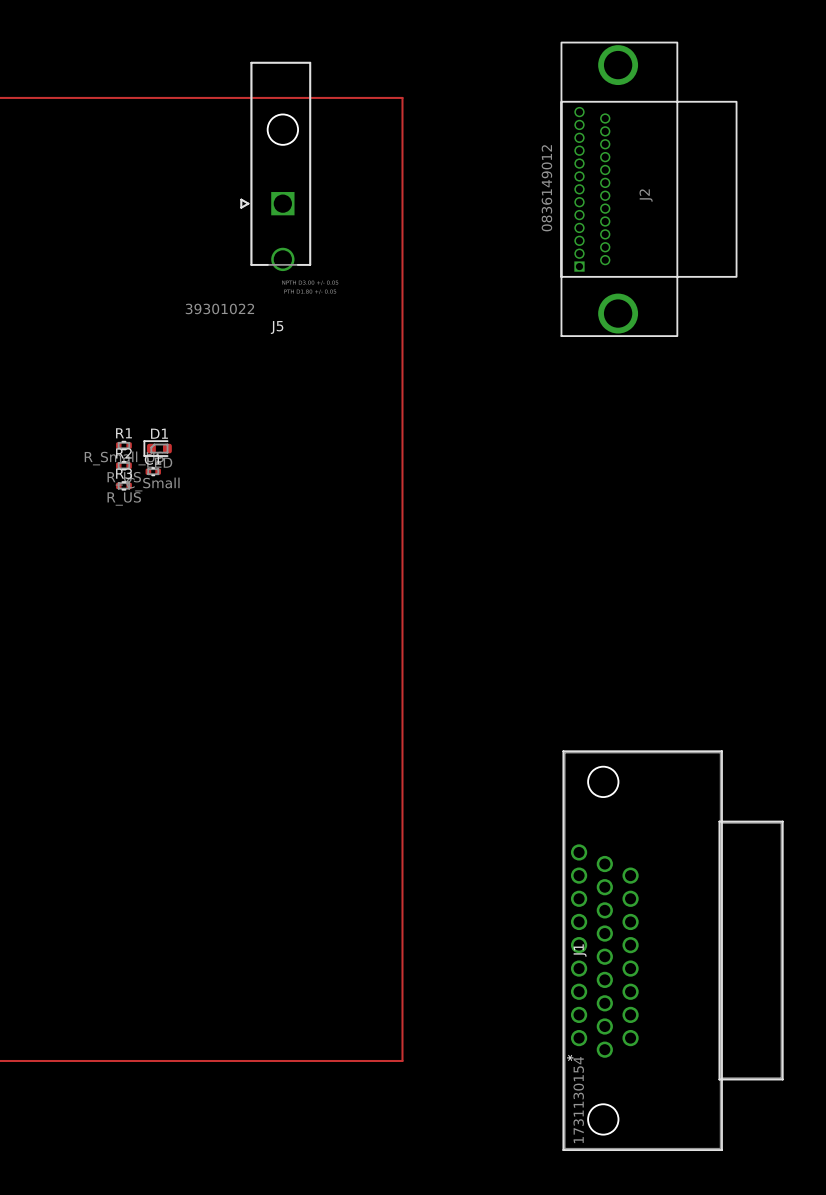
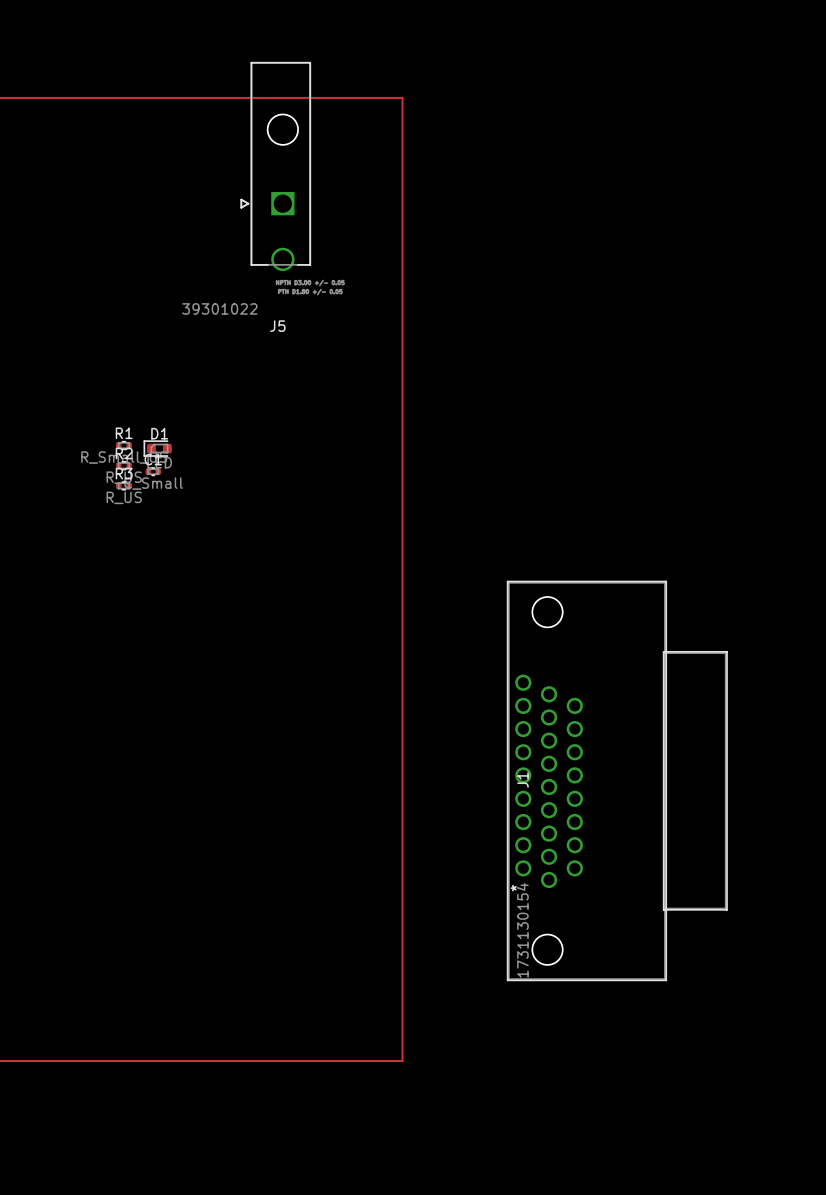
J2: 0836149012 (649, 189) -> none
J1 position: (673, 950) -> (617, 780)

